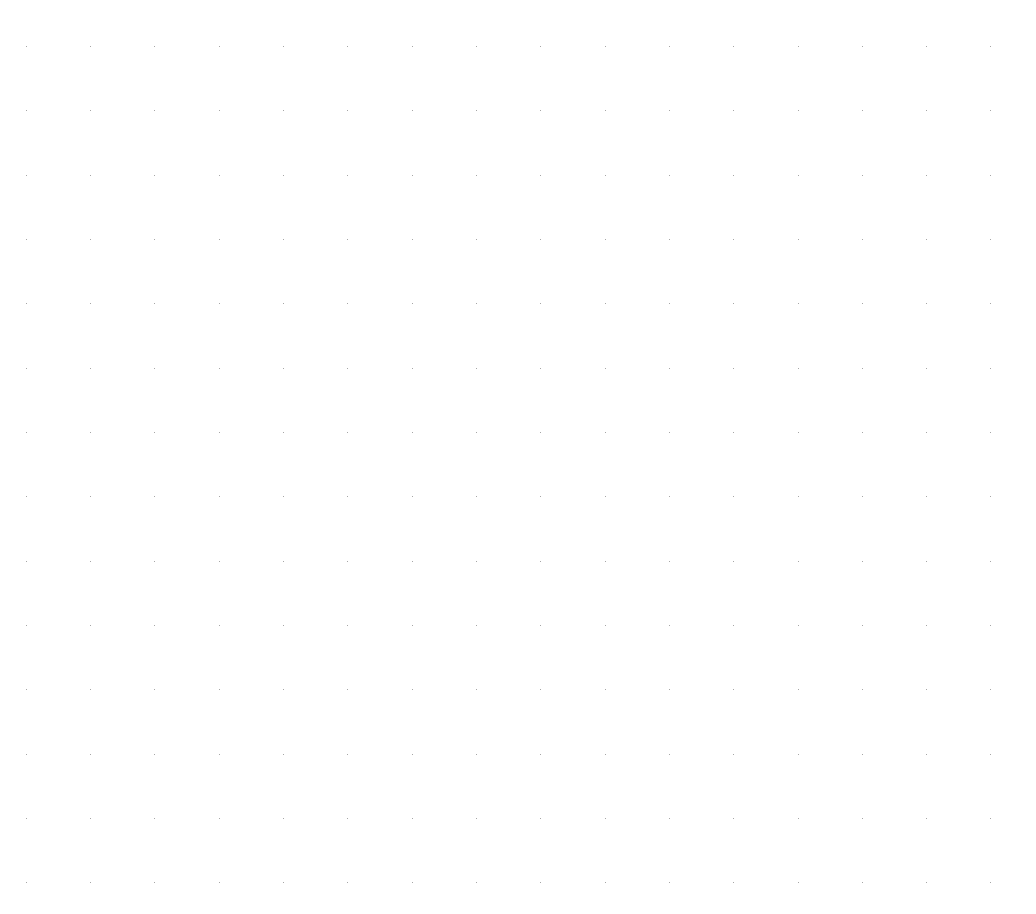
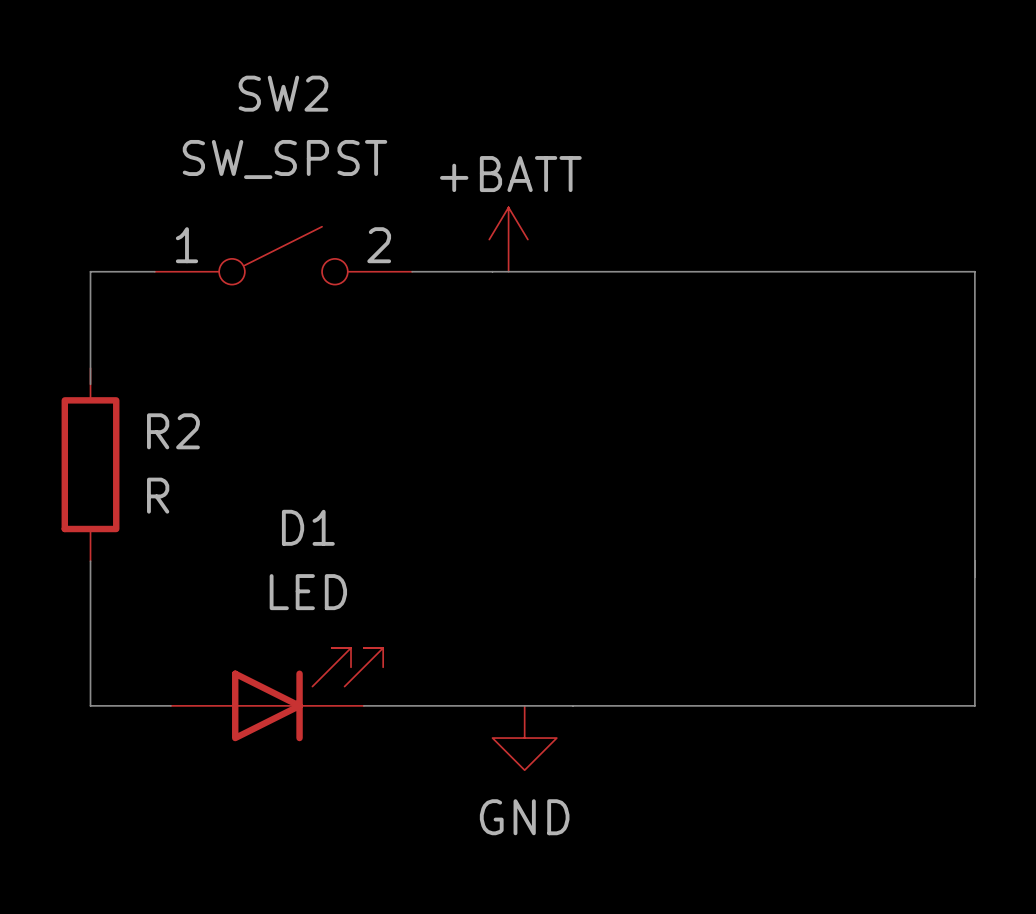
power symbol: none -> +BATT (508, 239)
SW2: none -> SW_SPST (283, 255)
bus: none -> (154, 271) (90, 271) (90, 384)
bus: none -> (412, 271) (974, 271) (974, 705) (363, 705)
R2: none -> R (90, 464)
bus: none -> (90, 561) (90, 705) (170, 705)
D1: none -> LED (277, 694)
power symbol: none -> GND (524, 738)

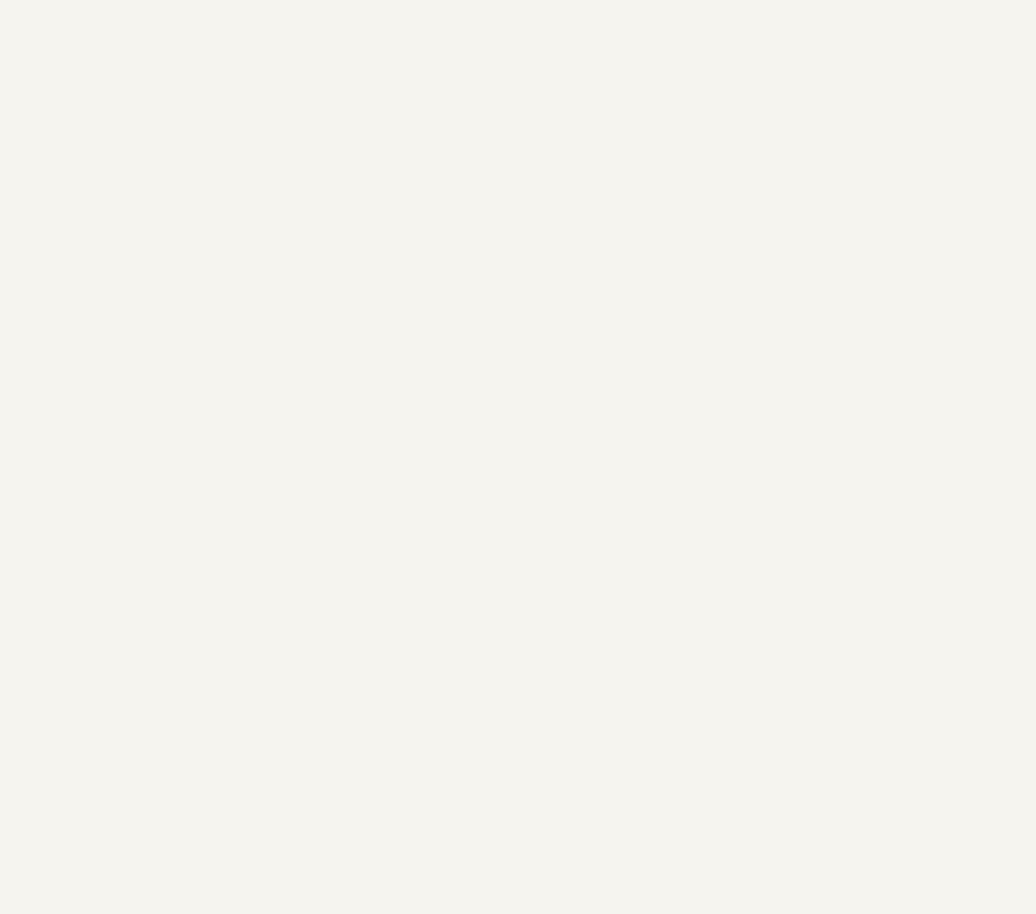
power symbol: +BATT (508, 239) -> none
SW2: SW_SPST (283, 255) -> none
bus: (154, 271) (90, 271) (90, 384) -> none
bus: (412, 271) (974, 271) (974, 705) (363, 705) -> none
R2: R (90, 464) -> none
bus: (90, 561) (90, 705) (170, 705) -> none
D1: LED (277, 694) -> none
power symbol: GND (524, 738) -> none

